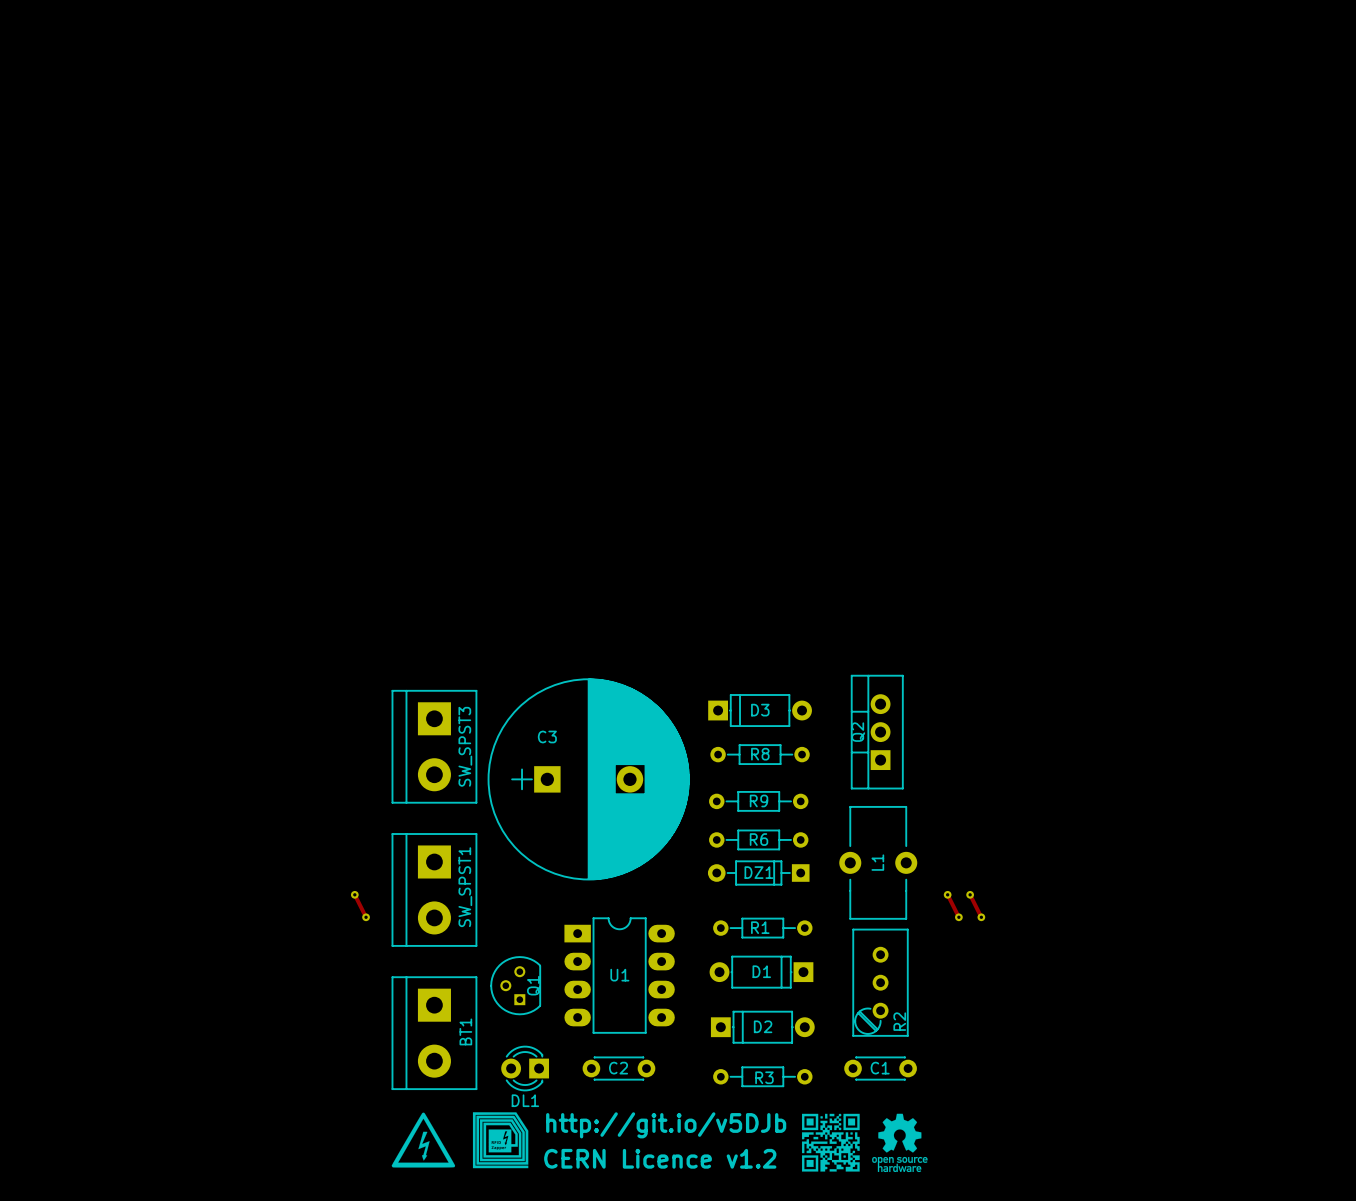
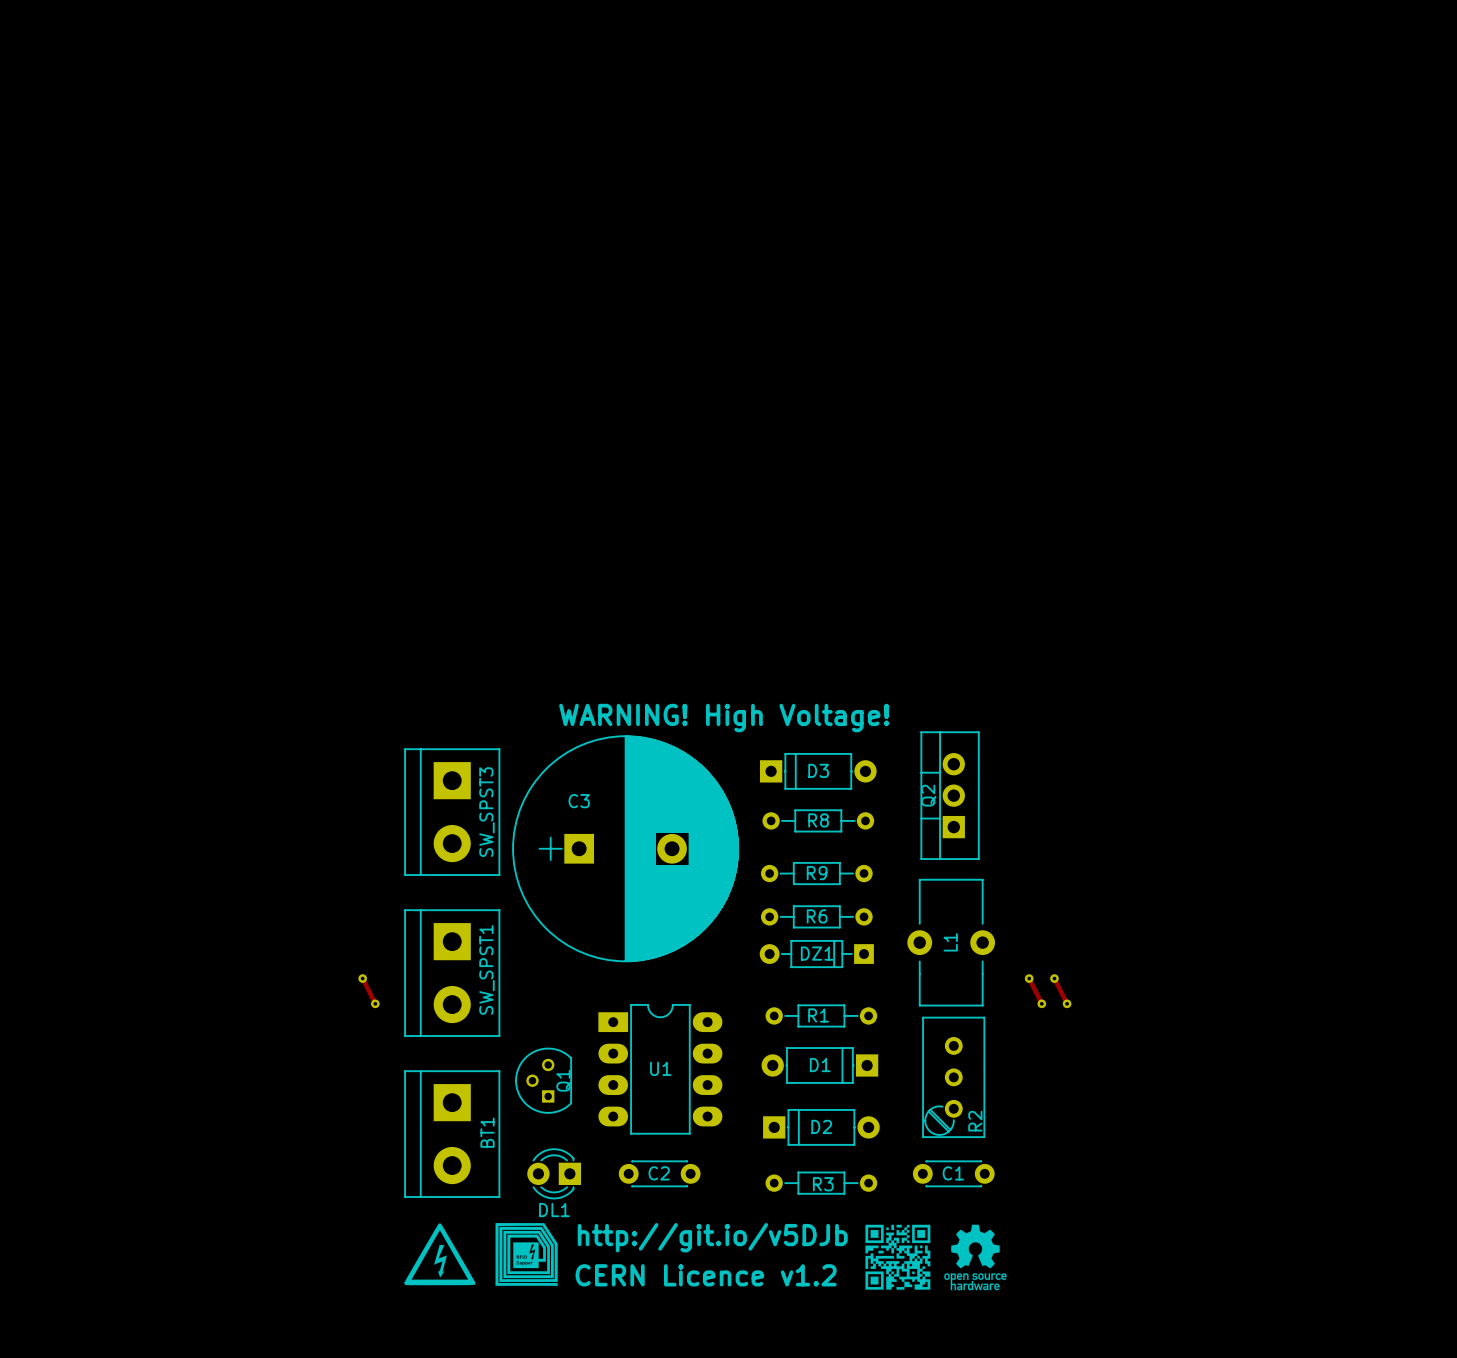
text: none -> WARNING! High Voltage! (724, 718)

